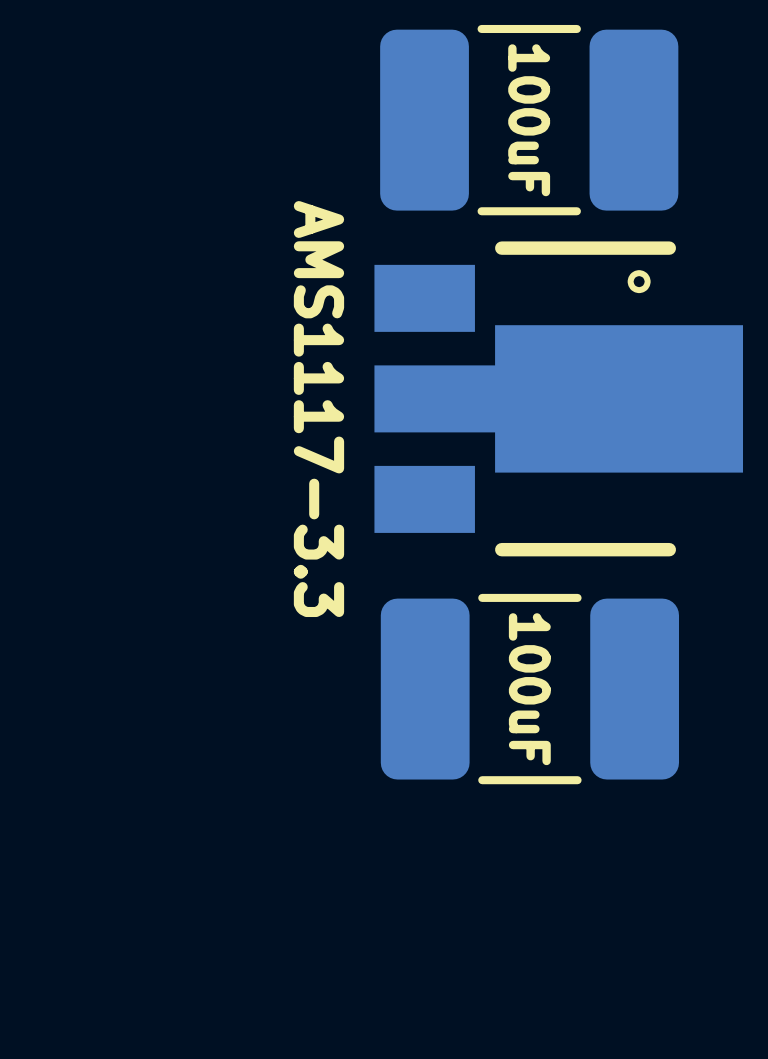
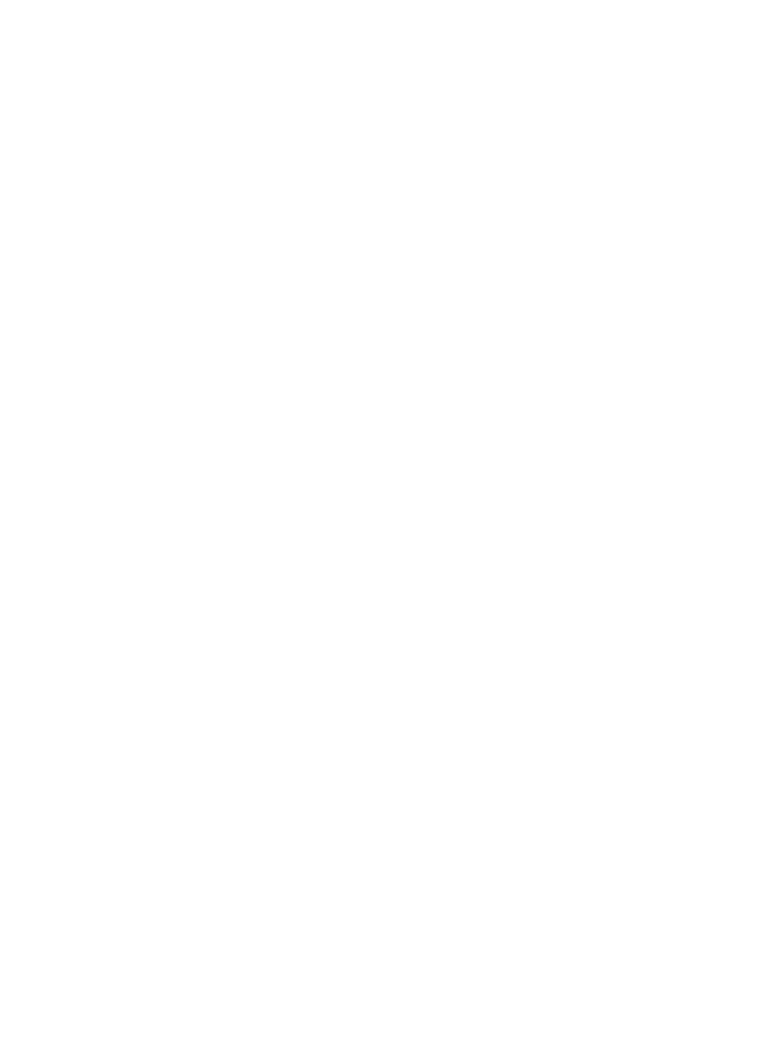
part: 100uF (529, 120) -> none
part: AMS1117-3.3 (558, 398) -> none
part: 100uF (529, 689) -> none

